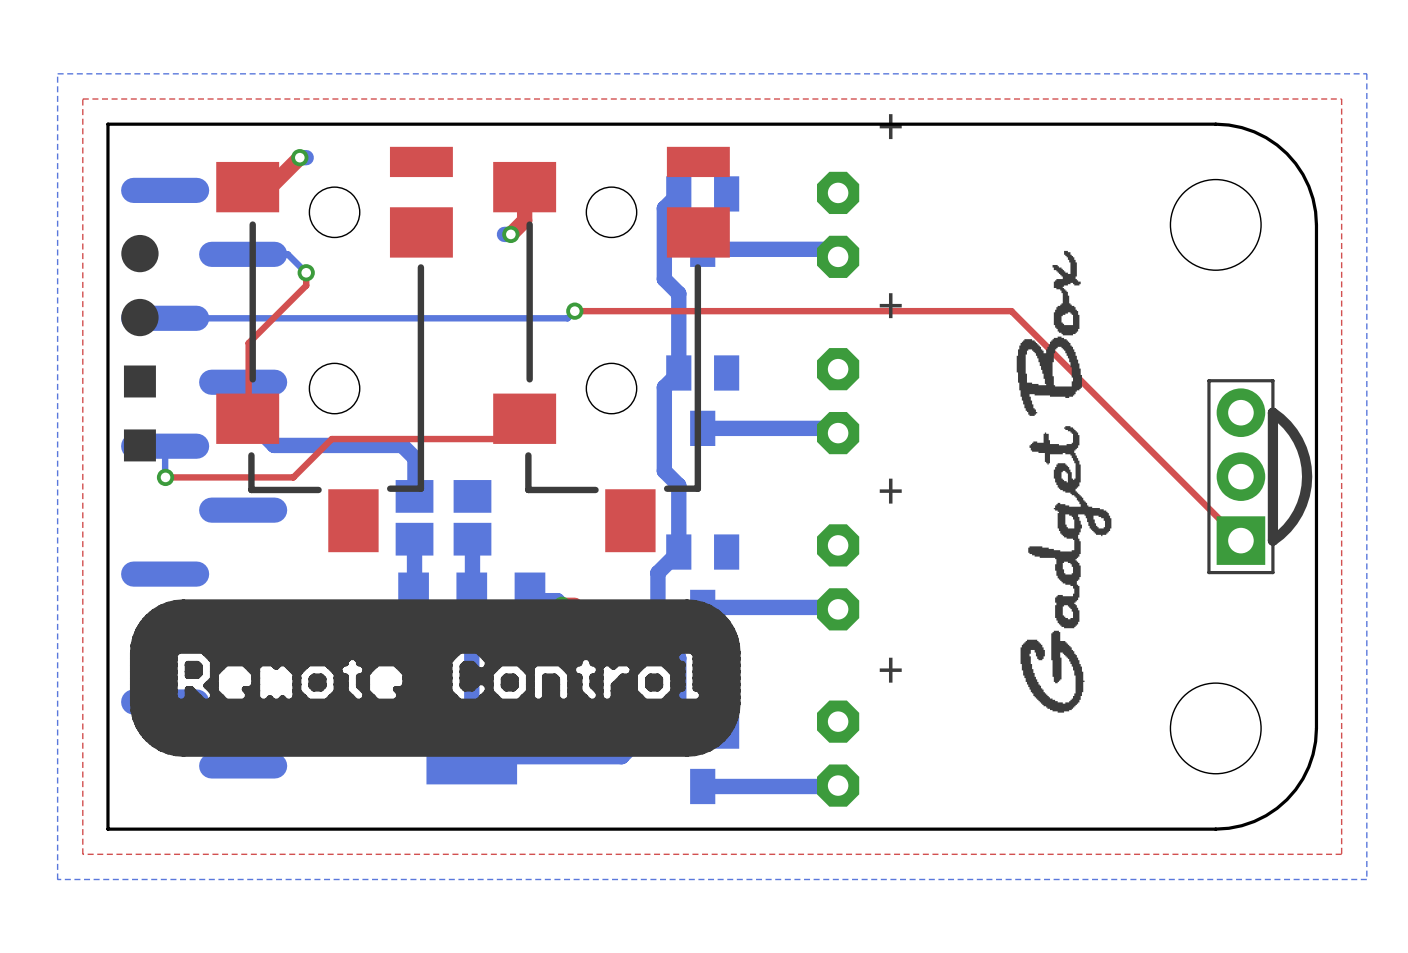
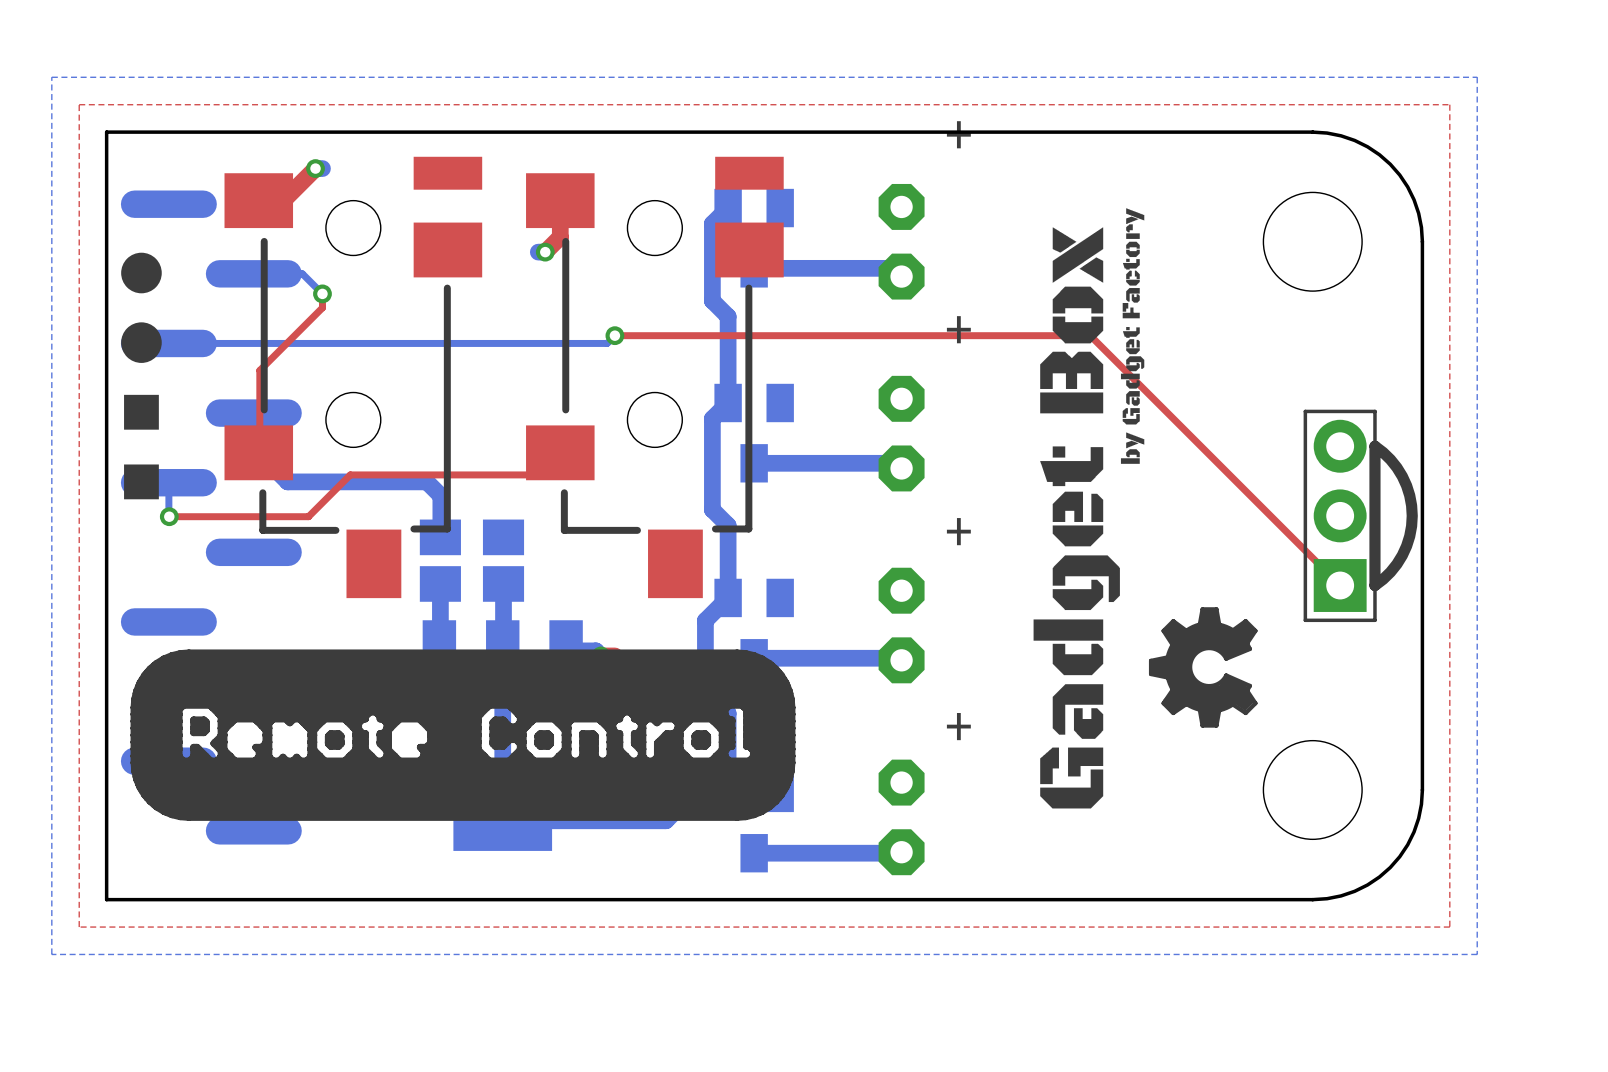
drawing: none -> [1033, 208, 1258, 809]
drawing: [1016, 250, 1112, 713] -> none

